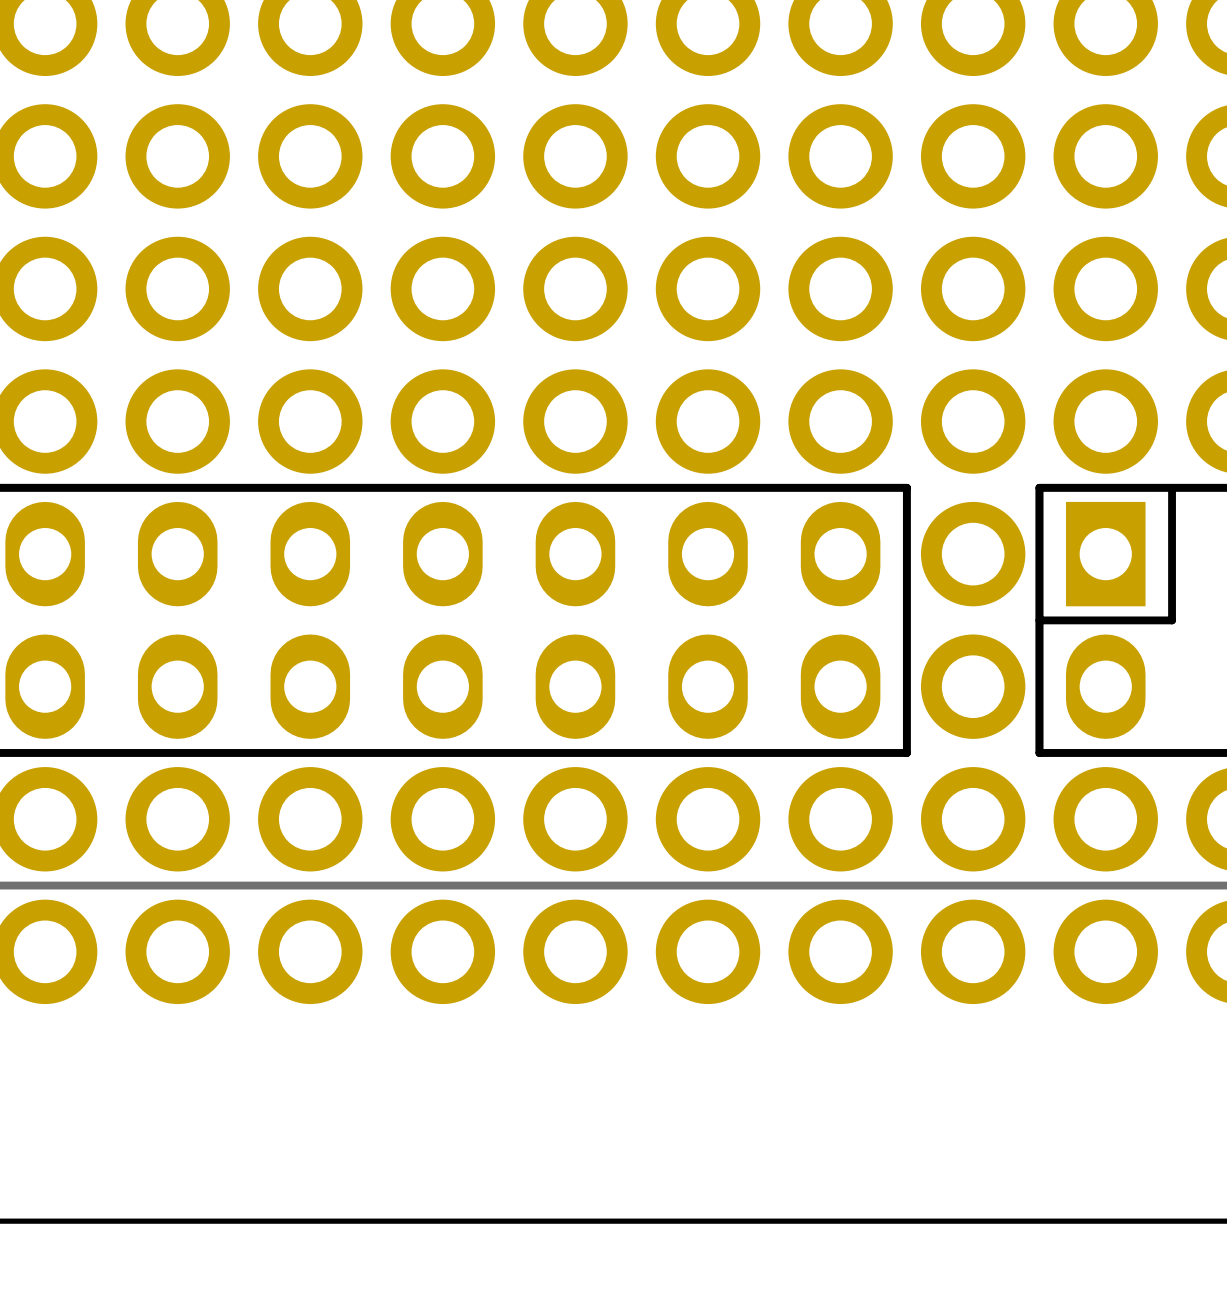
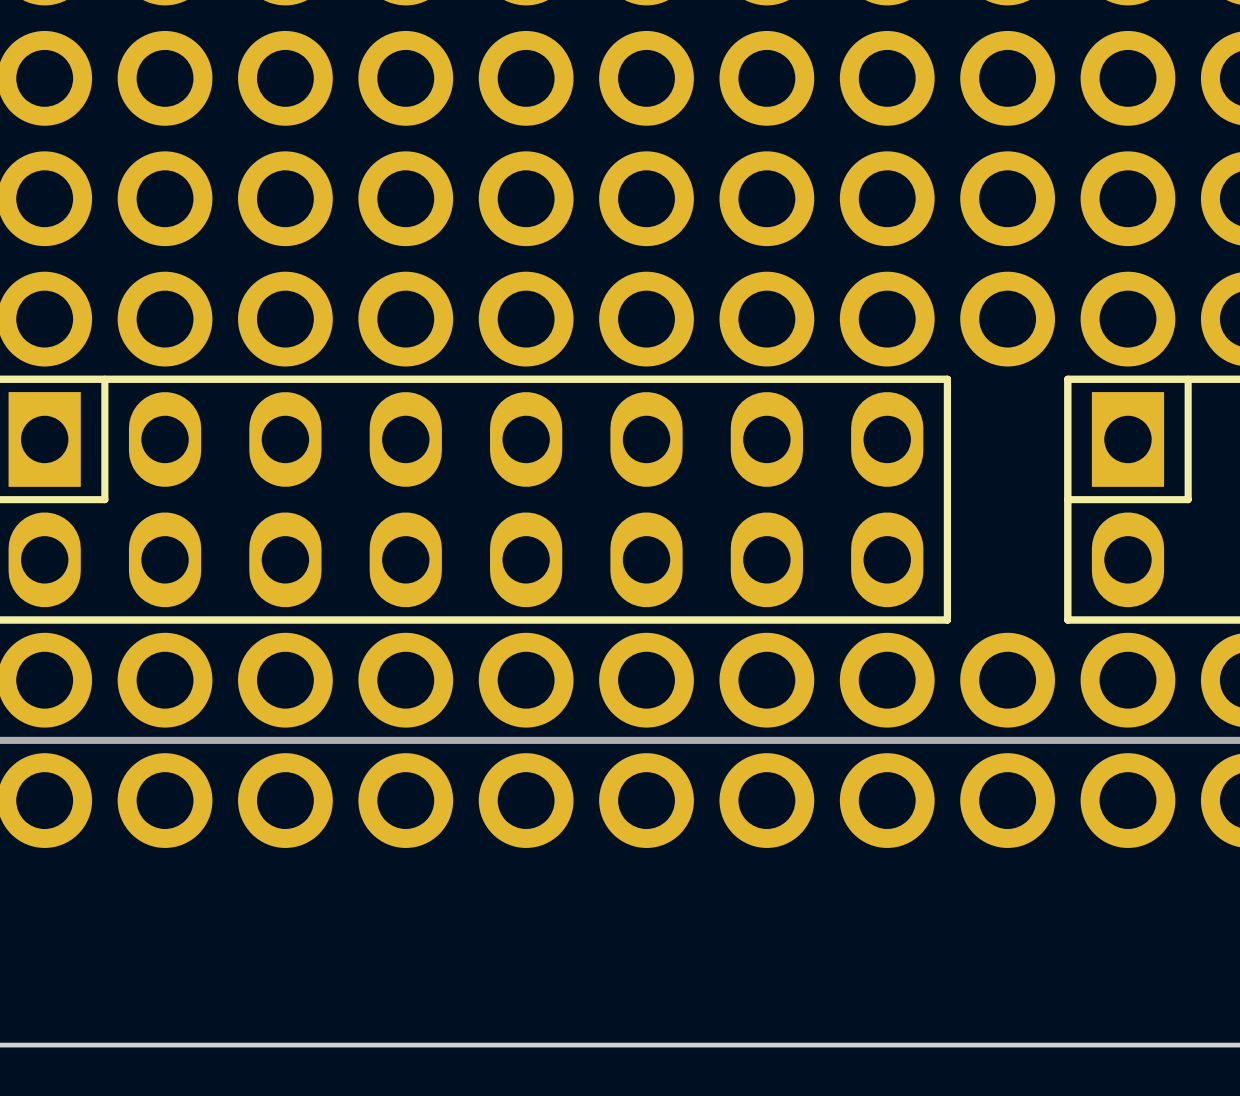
part: (973, 554) -> none
part: (973, 686) -> none

